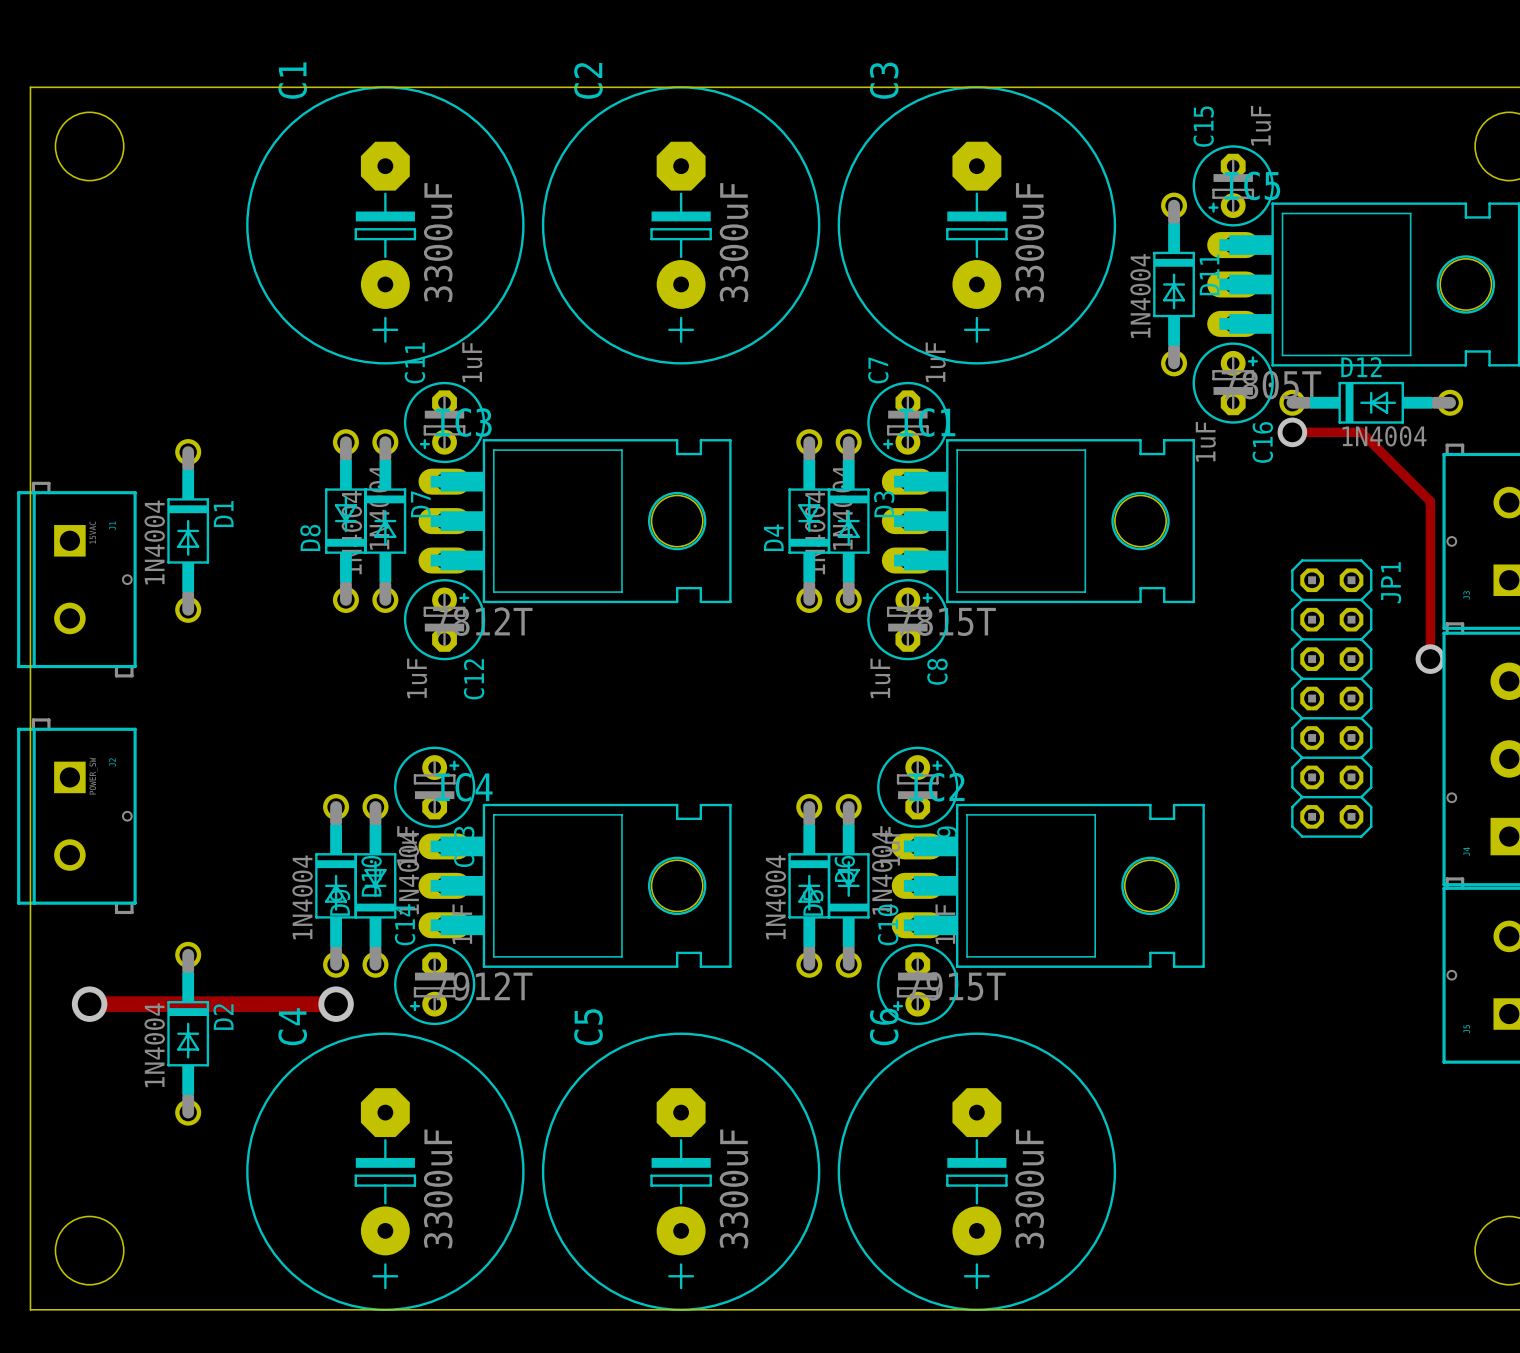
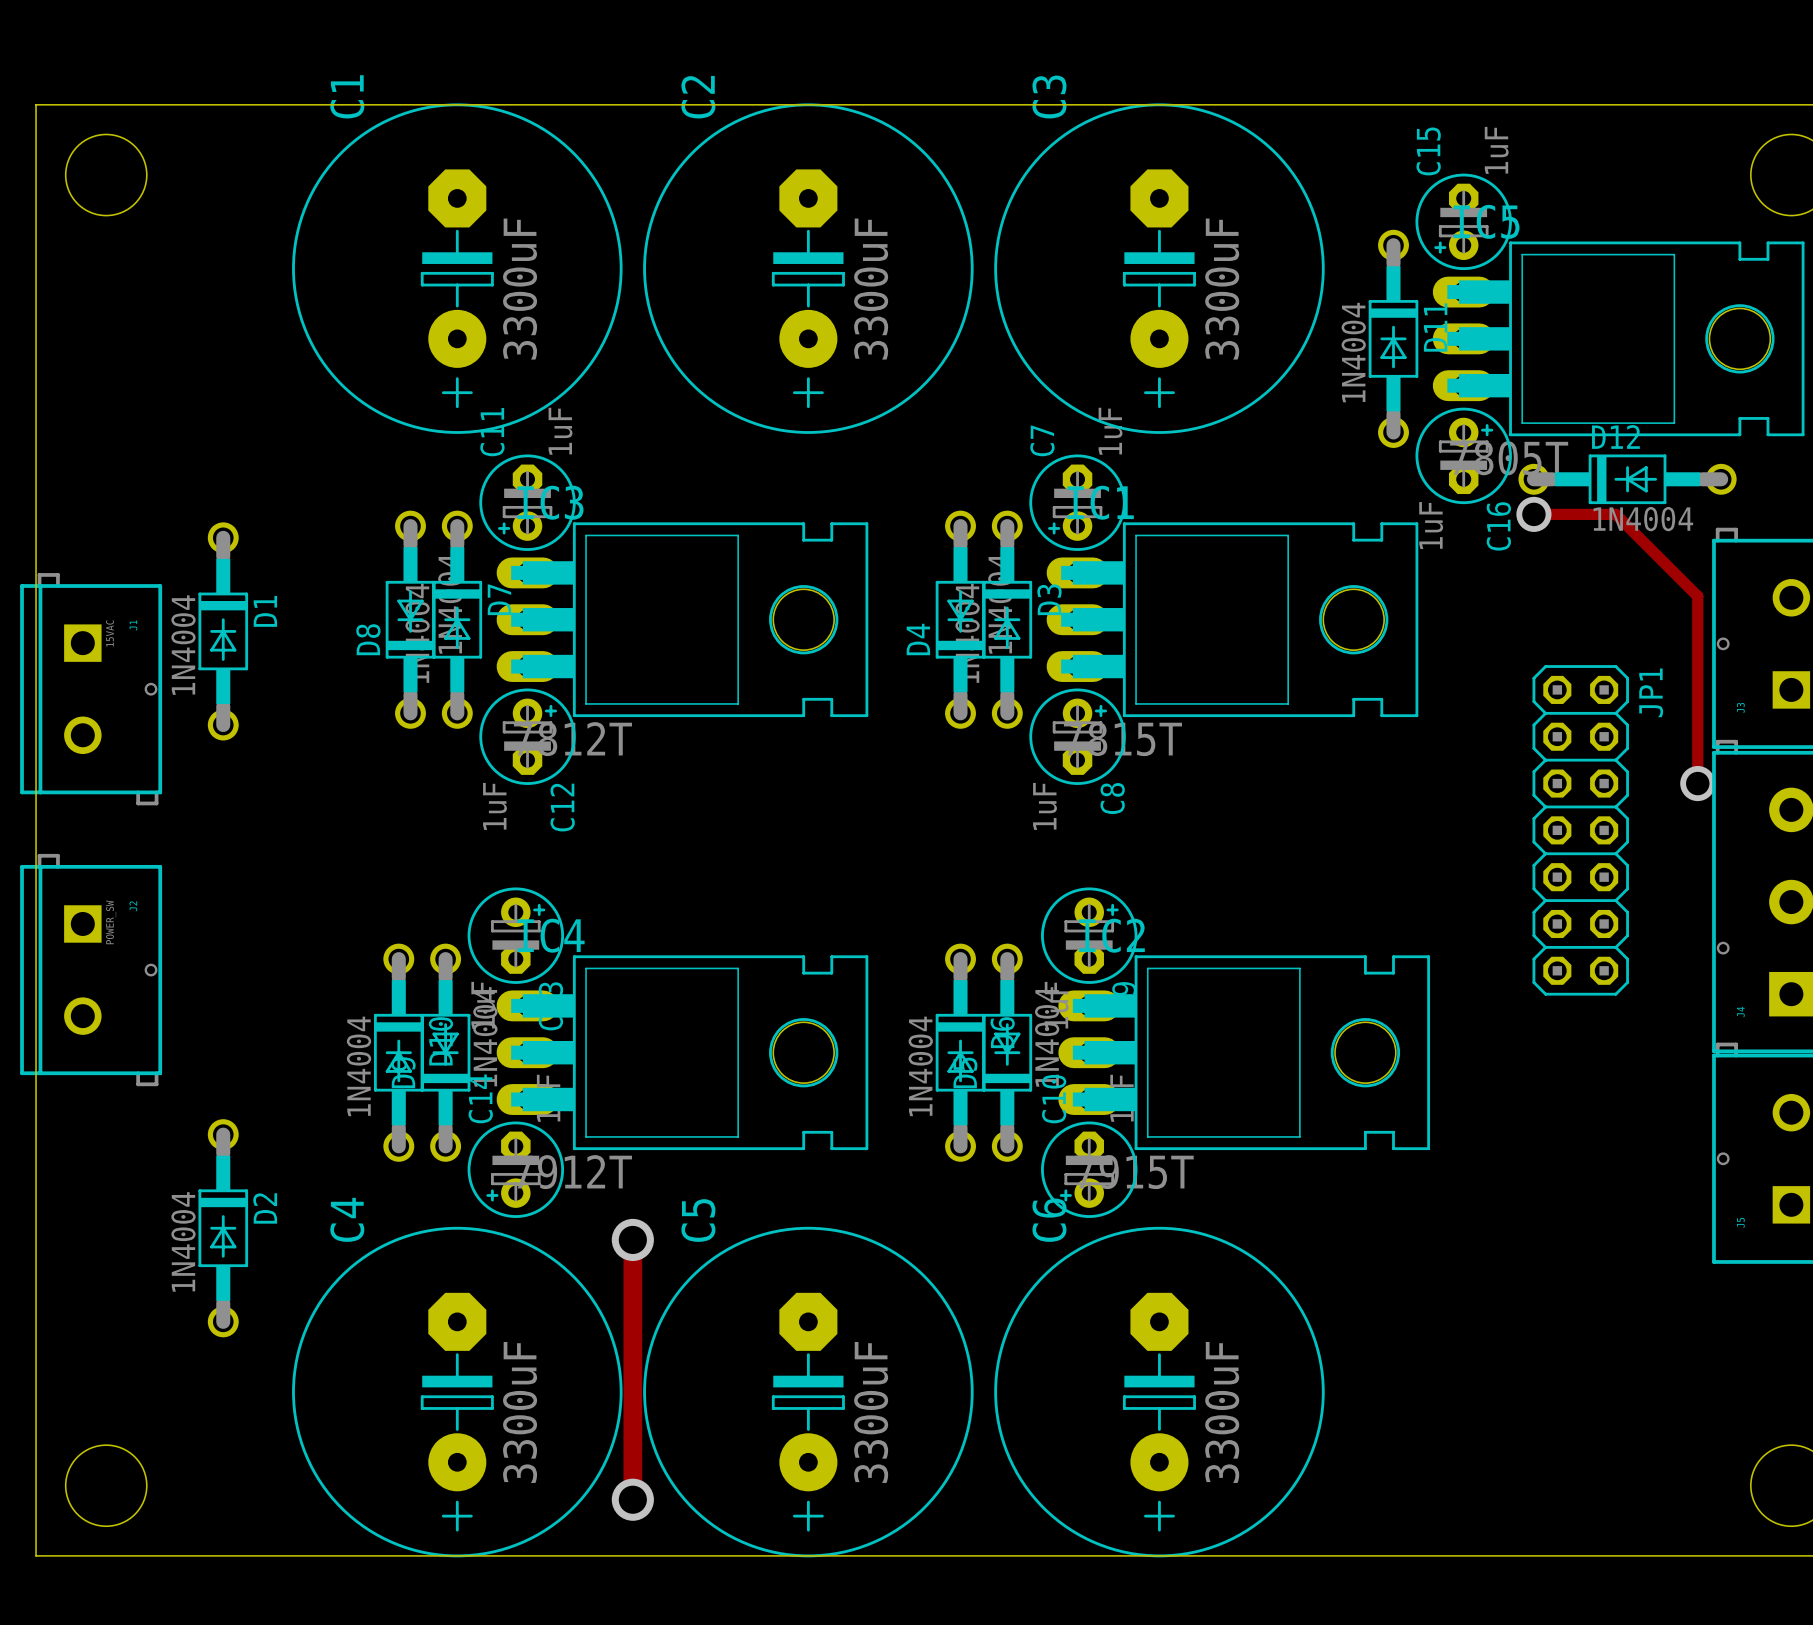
track: (89, 1004) (336, 1004) -> none
via: (89, 1004) -> none
via: (336, 1004) -> none
track: none -> (632, 1239) (632, 1499)
via: none -> (632, 1239)
via: none -> (632, 1499)

